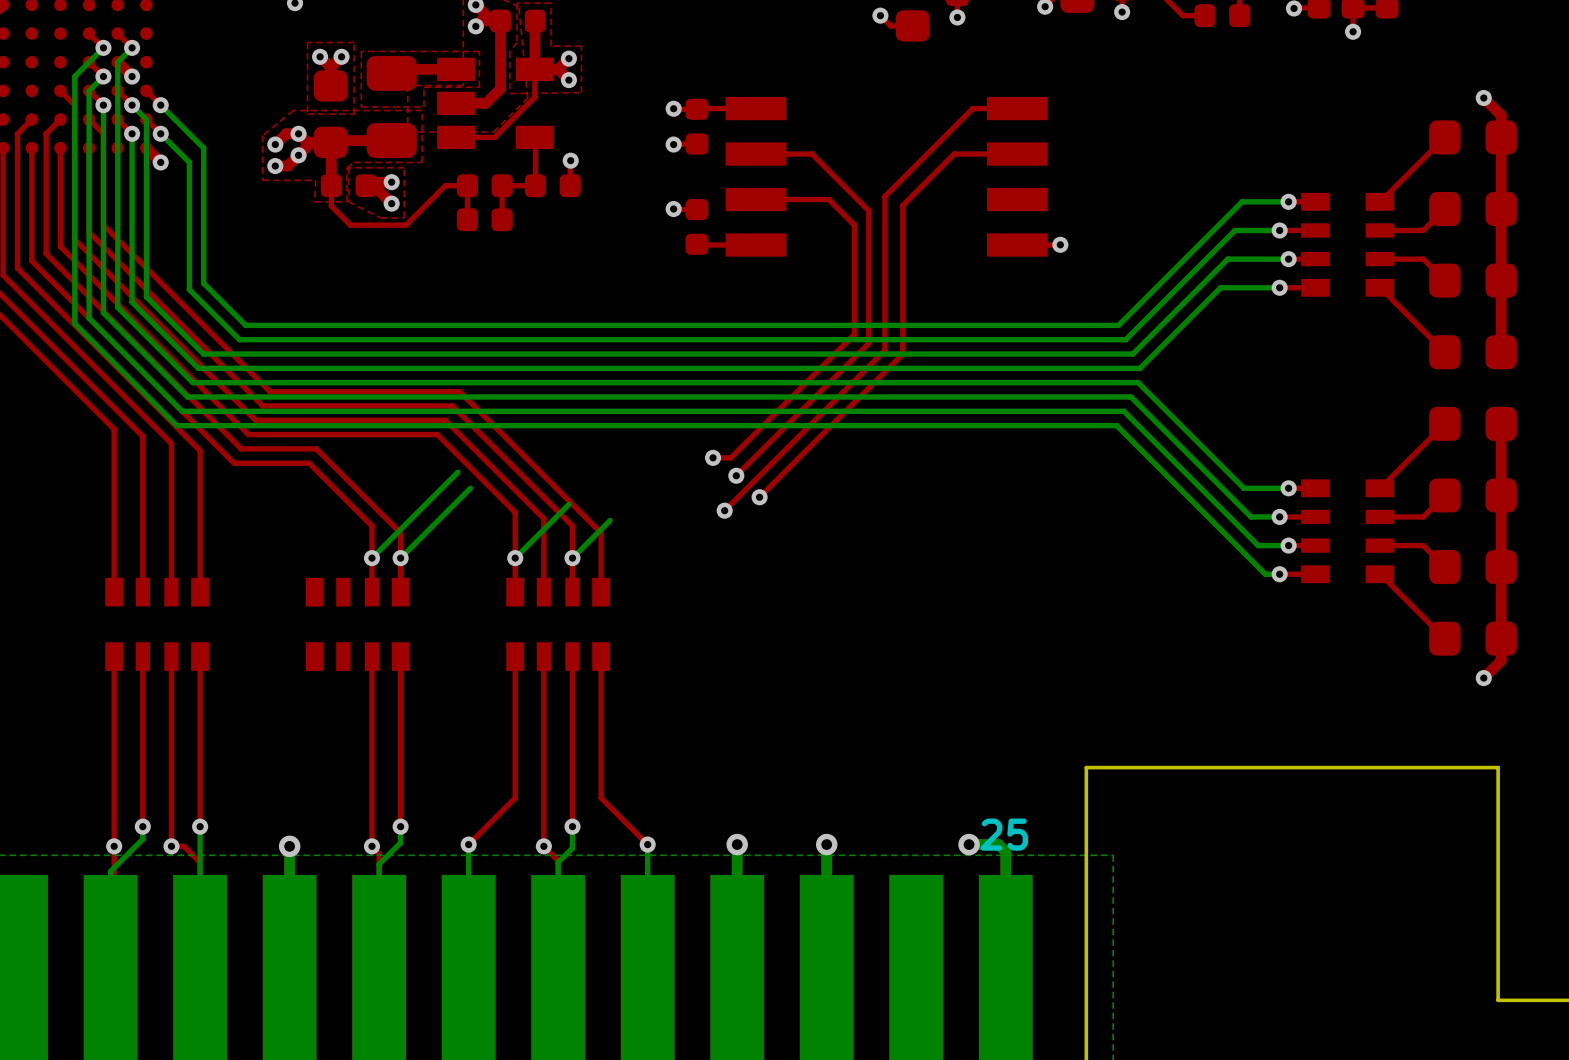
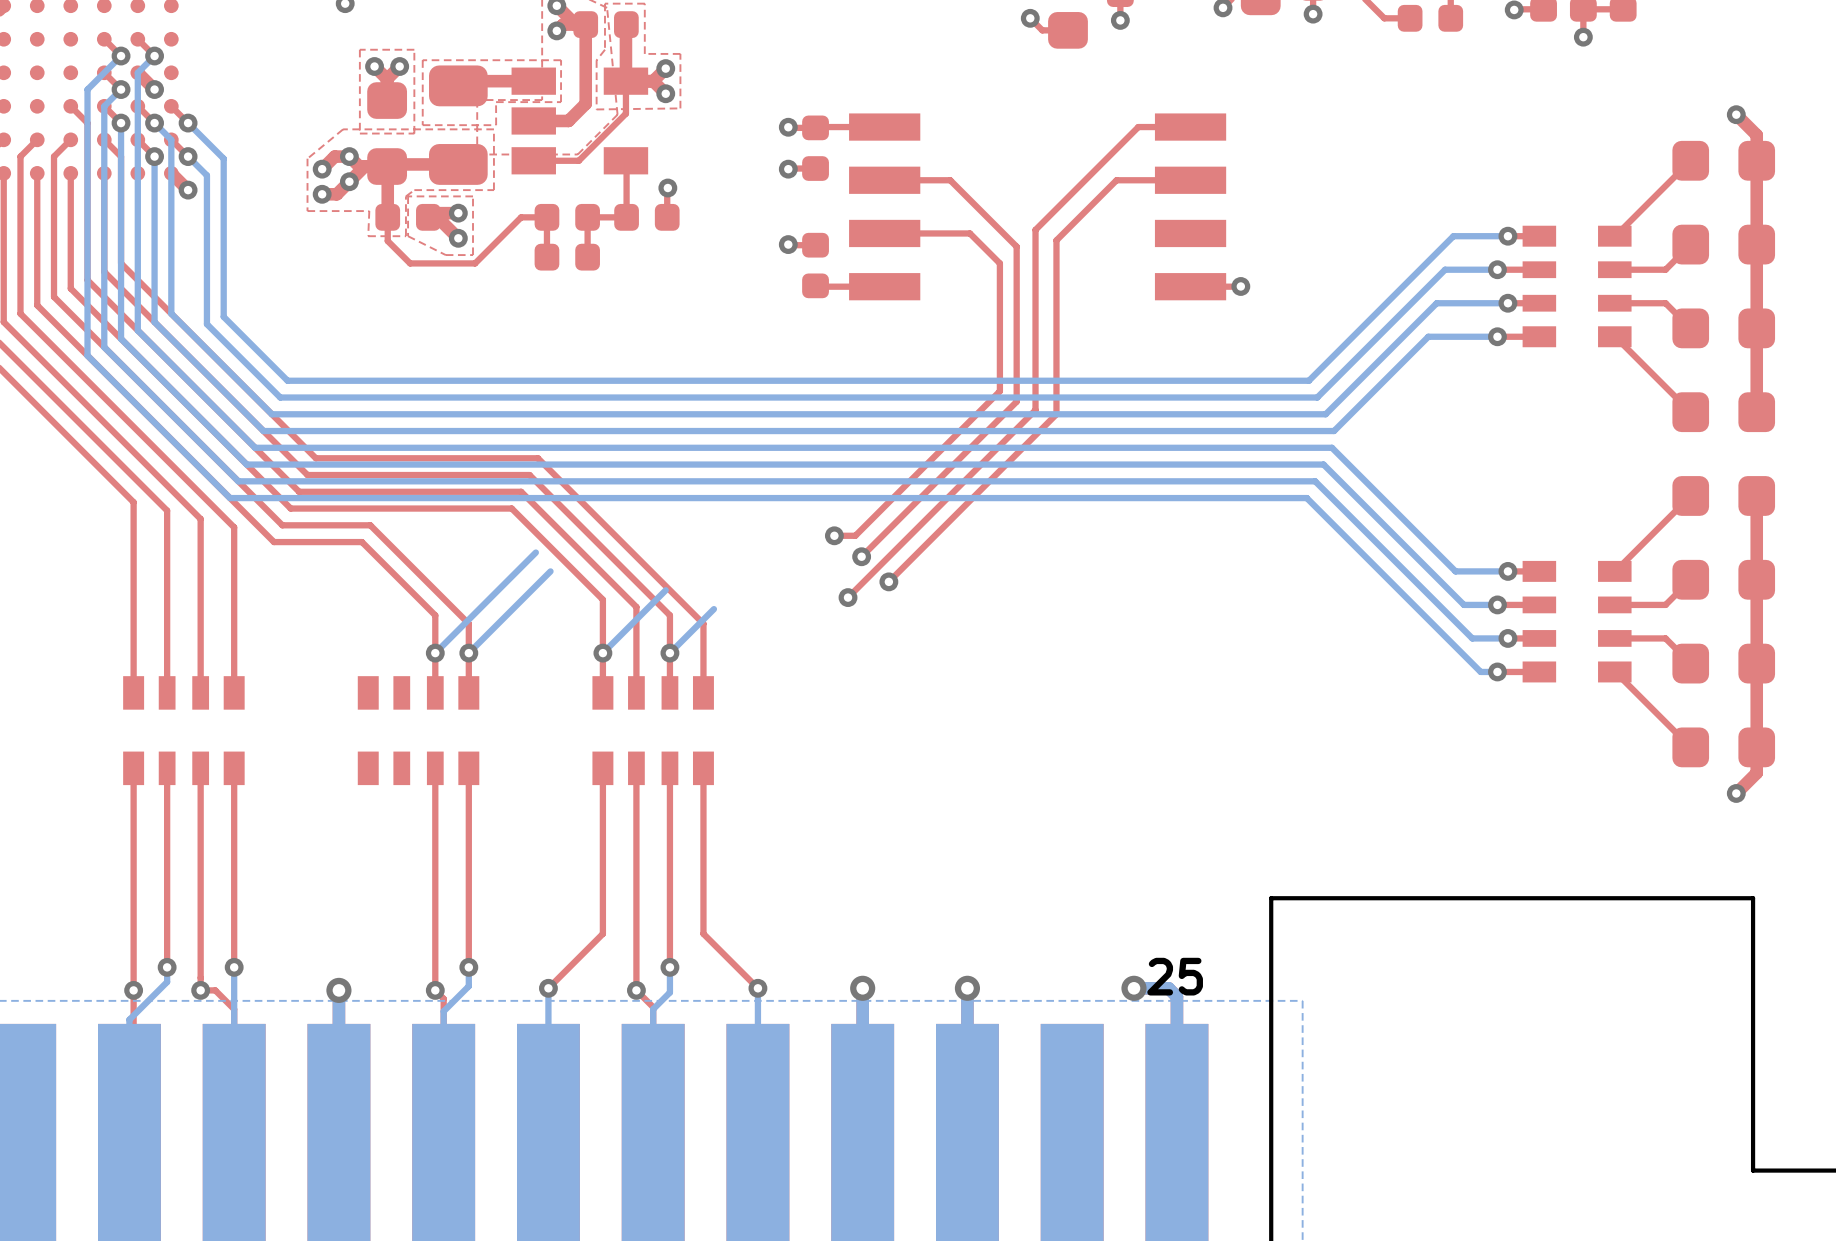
bottom track: (191, 135) (203, 148) (203, 283) -> (223, 158) (223, 316) (238, 331)
bottom track: (176, 149) (189, 162) (189, 289) -> (206, 175) (206, 324) (221, 338)
bottom track: (146, 268) (146, 296) (203, 354) (232, 354) -> (171, 313) (271, 414)
bottom track: (132, 275) (132, 302) (198, 368) (225, 368) -> (154, 322) (263, 431)
bottom track: (117, 282) (117, 307) (192, 382) (218, 382) -> (137, 330) (255, 447)
bottom track: (103, 289) (103, 312) (187, 396) (210, 396) -> (121, 338) (246, 464)
bottom track: (89, 296) (89, 318) -> (87, 355) (104, 372)
bottom track: none -> (104, 347) (238, 481)
bottom track: (74, 303) (74, 323) (176, 425) (196, 425) -> none
bottom track: (203, 411) (182, 411) -> (229, 498) (213, 481)

